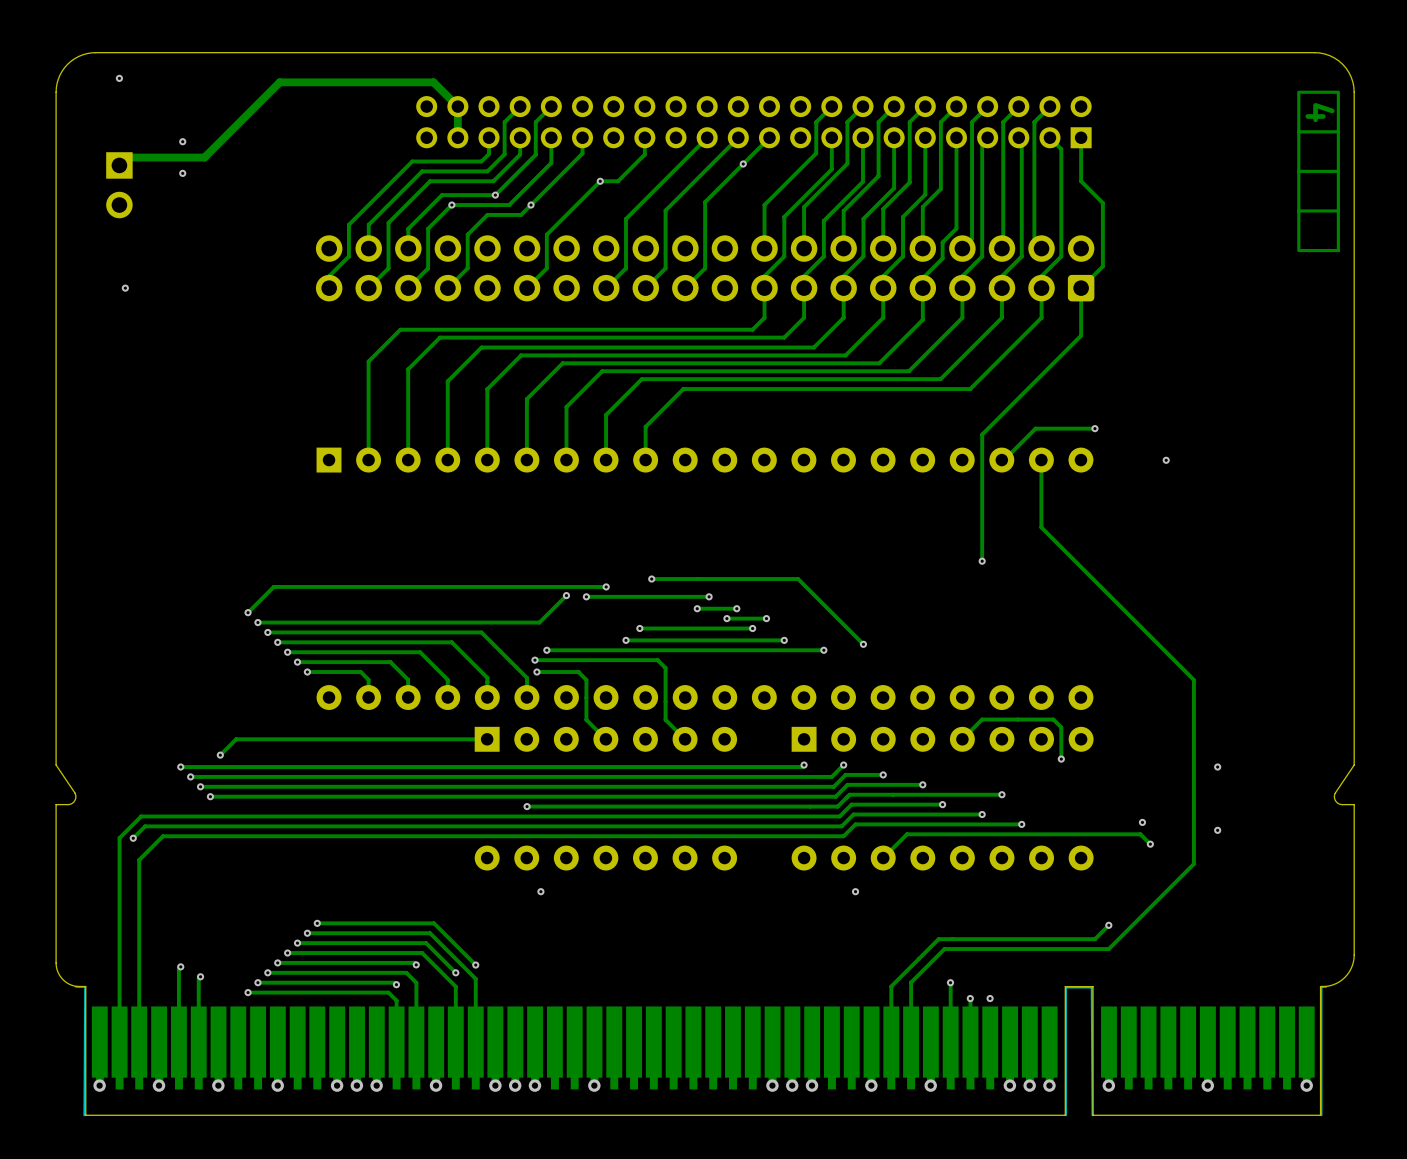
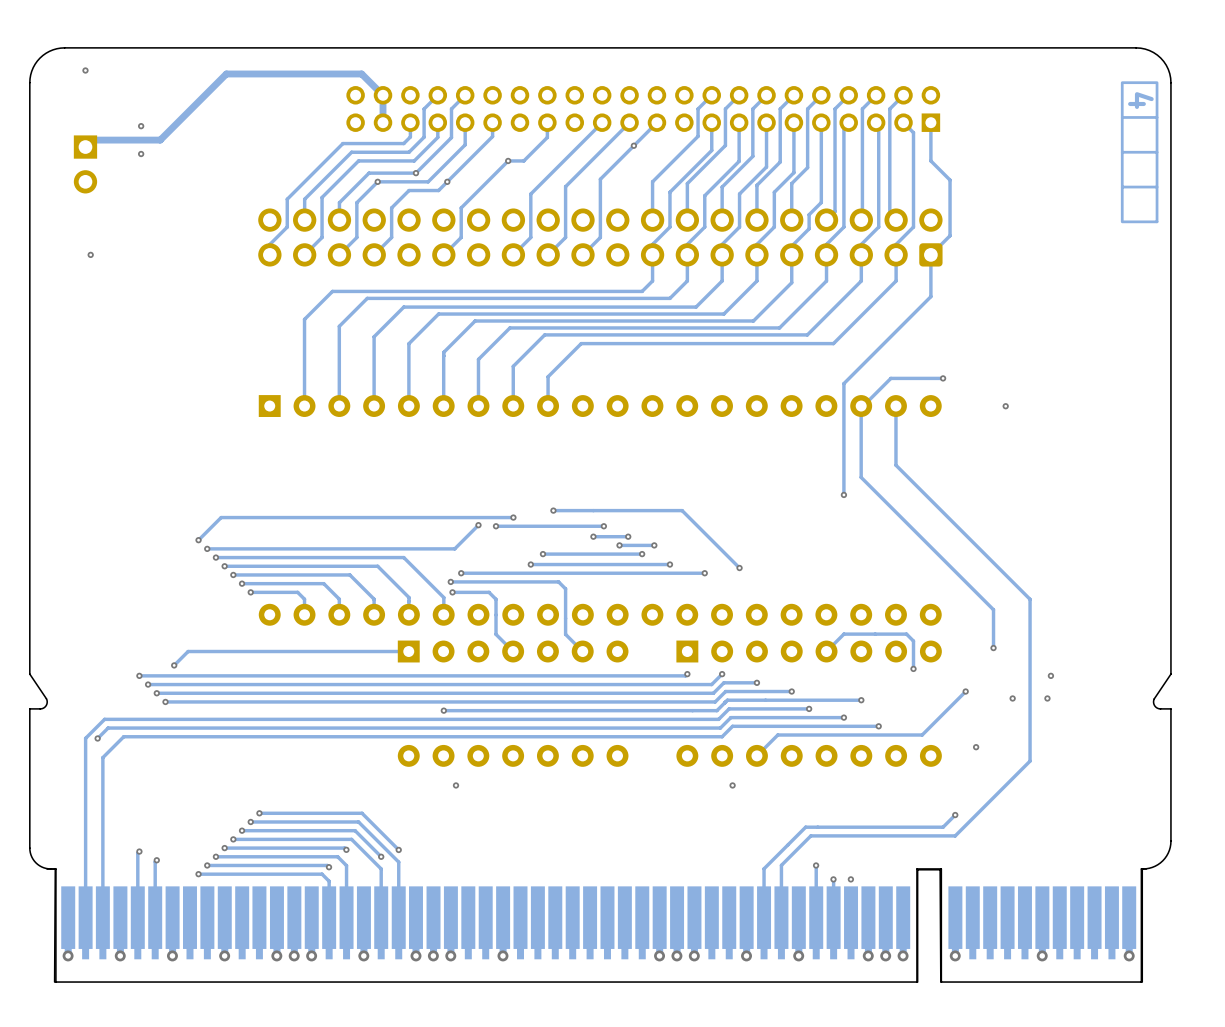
track: none -> (861, 406) (861, 477) (993, 609) (993, 648)
via: none -> (993, 648)
via: none -> (965, 691)
via: none -> (1012, 698)
via: none -> (1047, 698)
via: (1142, 822) -> none
via: (1217, 830) -> none
track: (1071, 834) (1140, 834) (1150, 844) -> (922, 735) (965, 691)
via: (1150, 844) -> none
via: none -> (976, 747)

